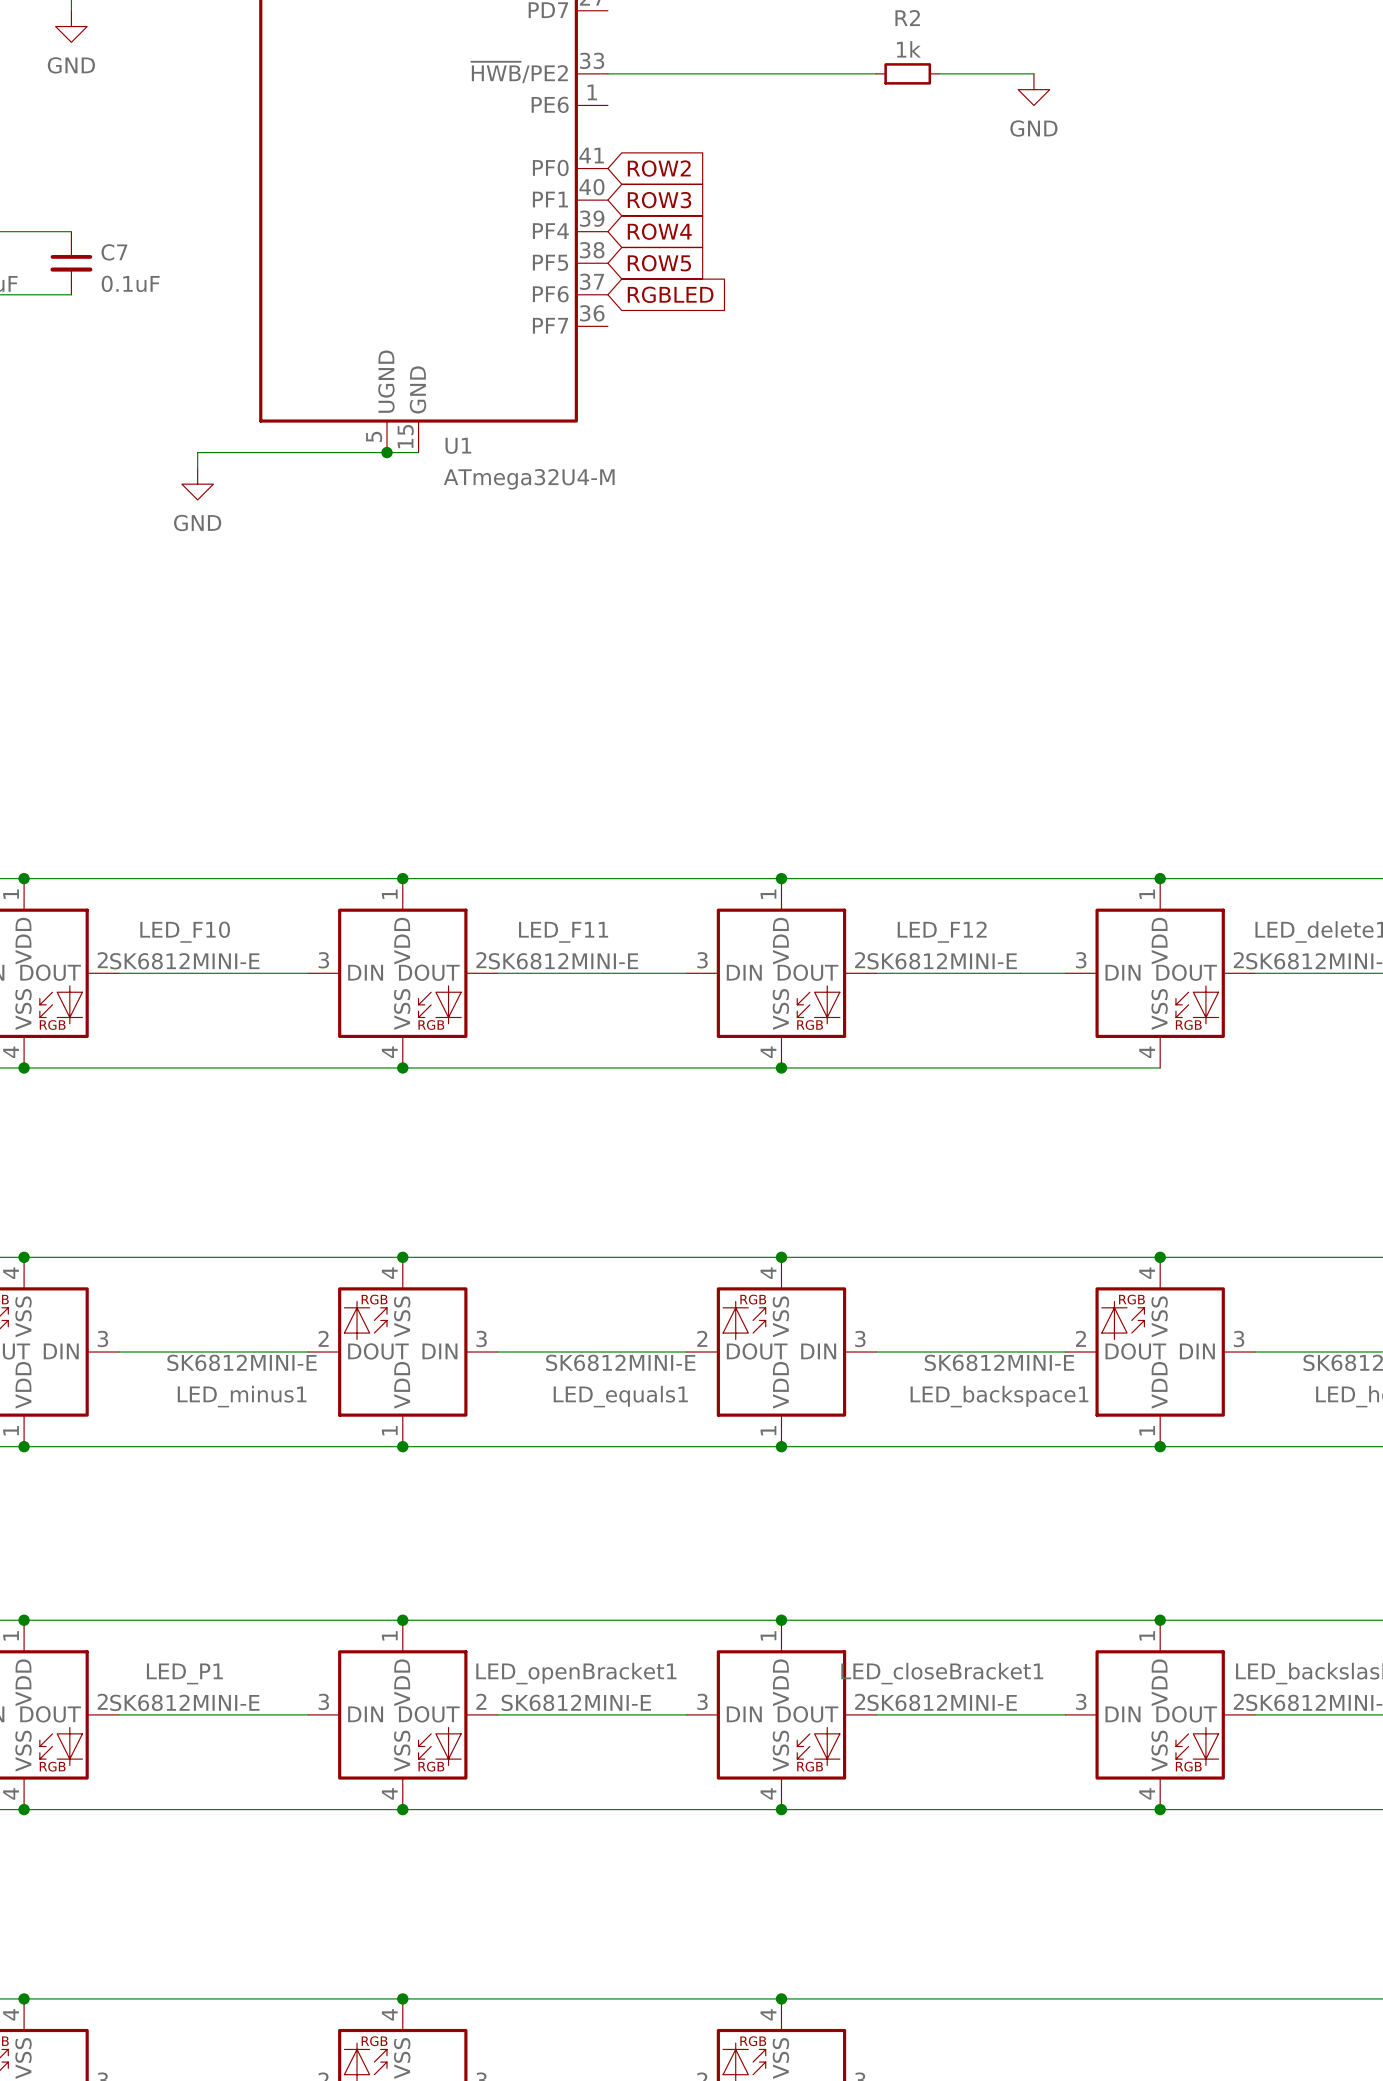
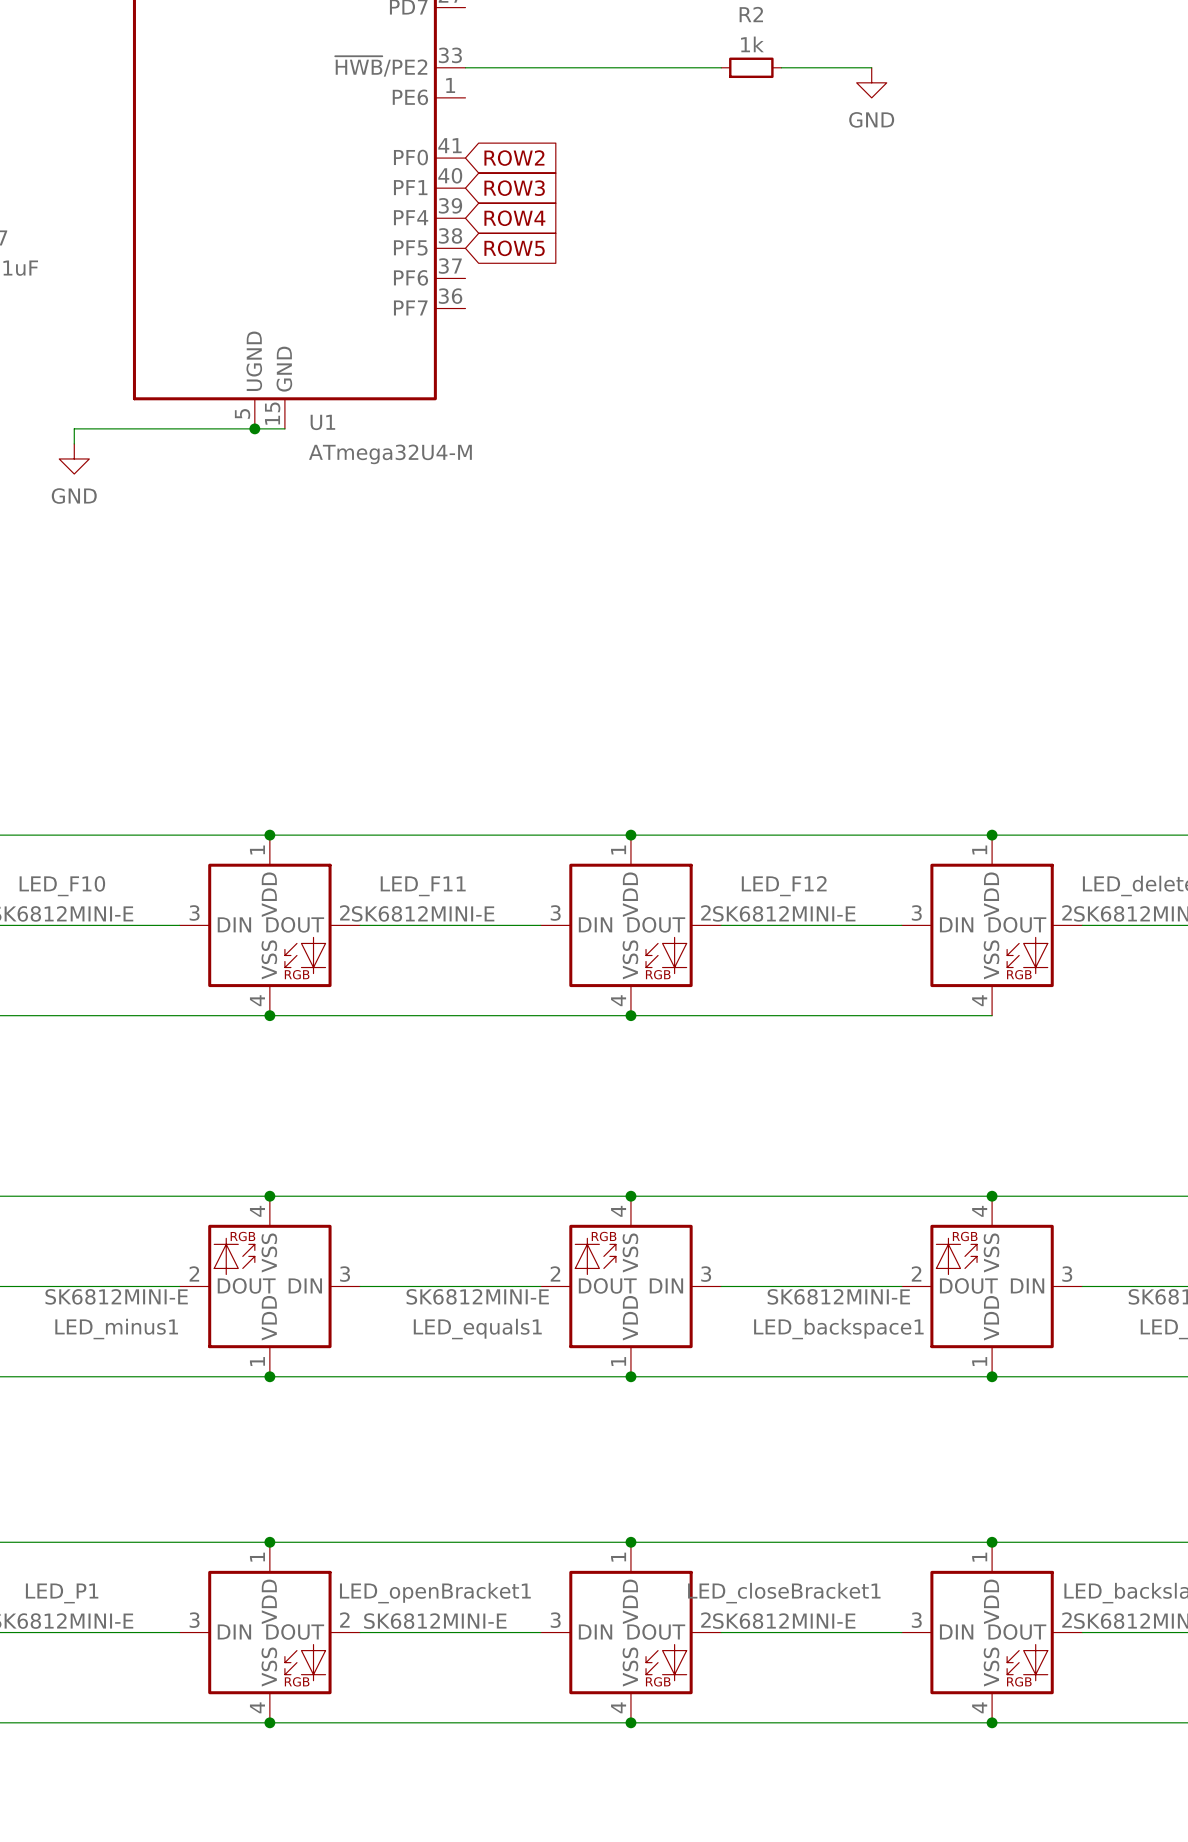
global label: RGBLED (670, 294) -> none

